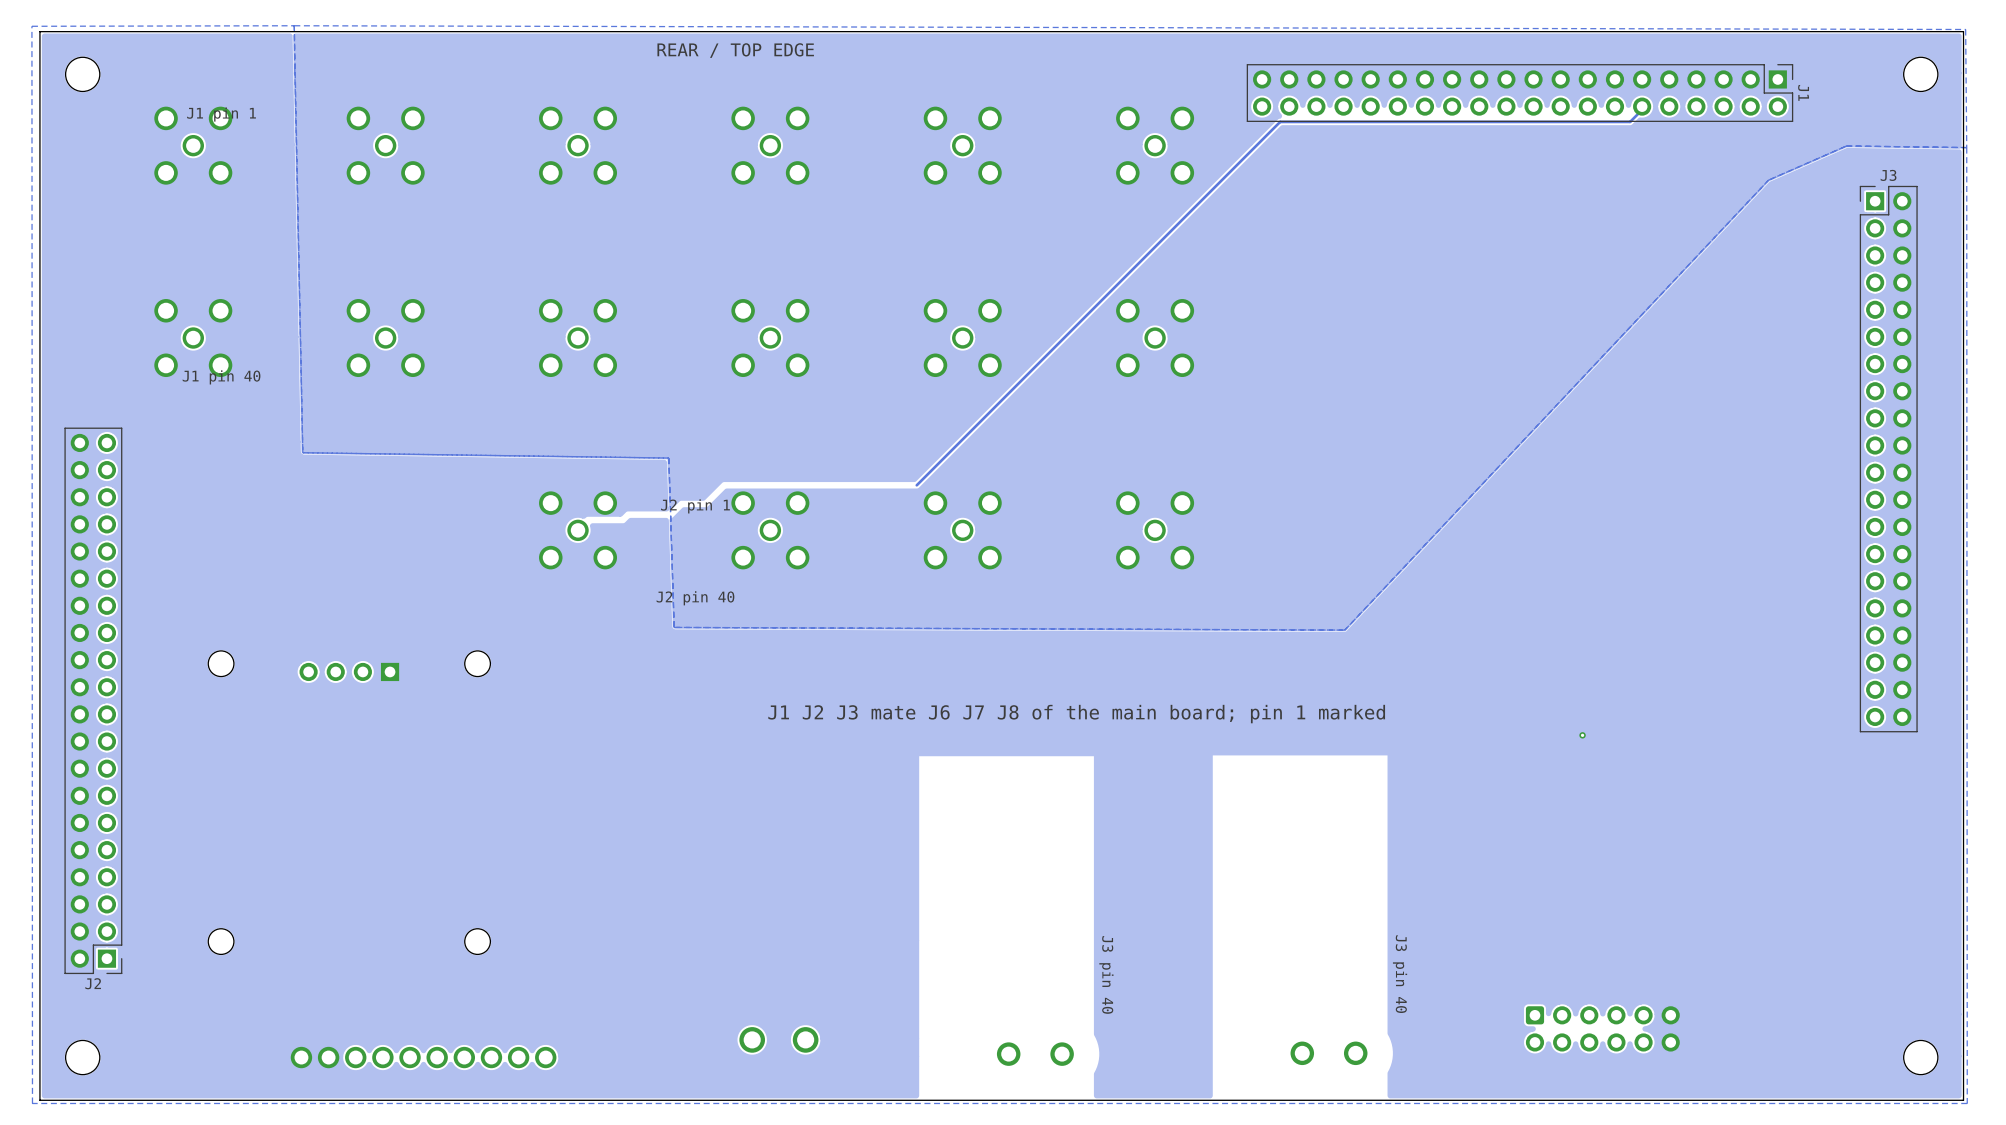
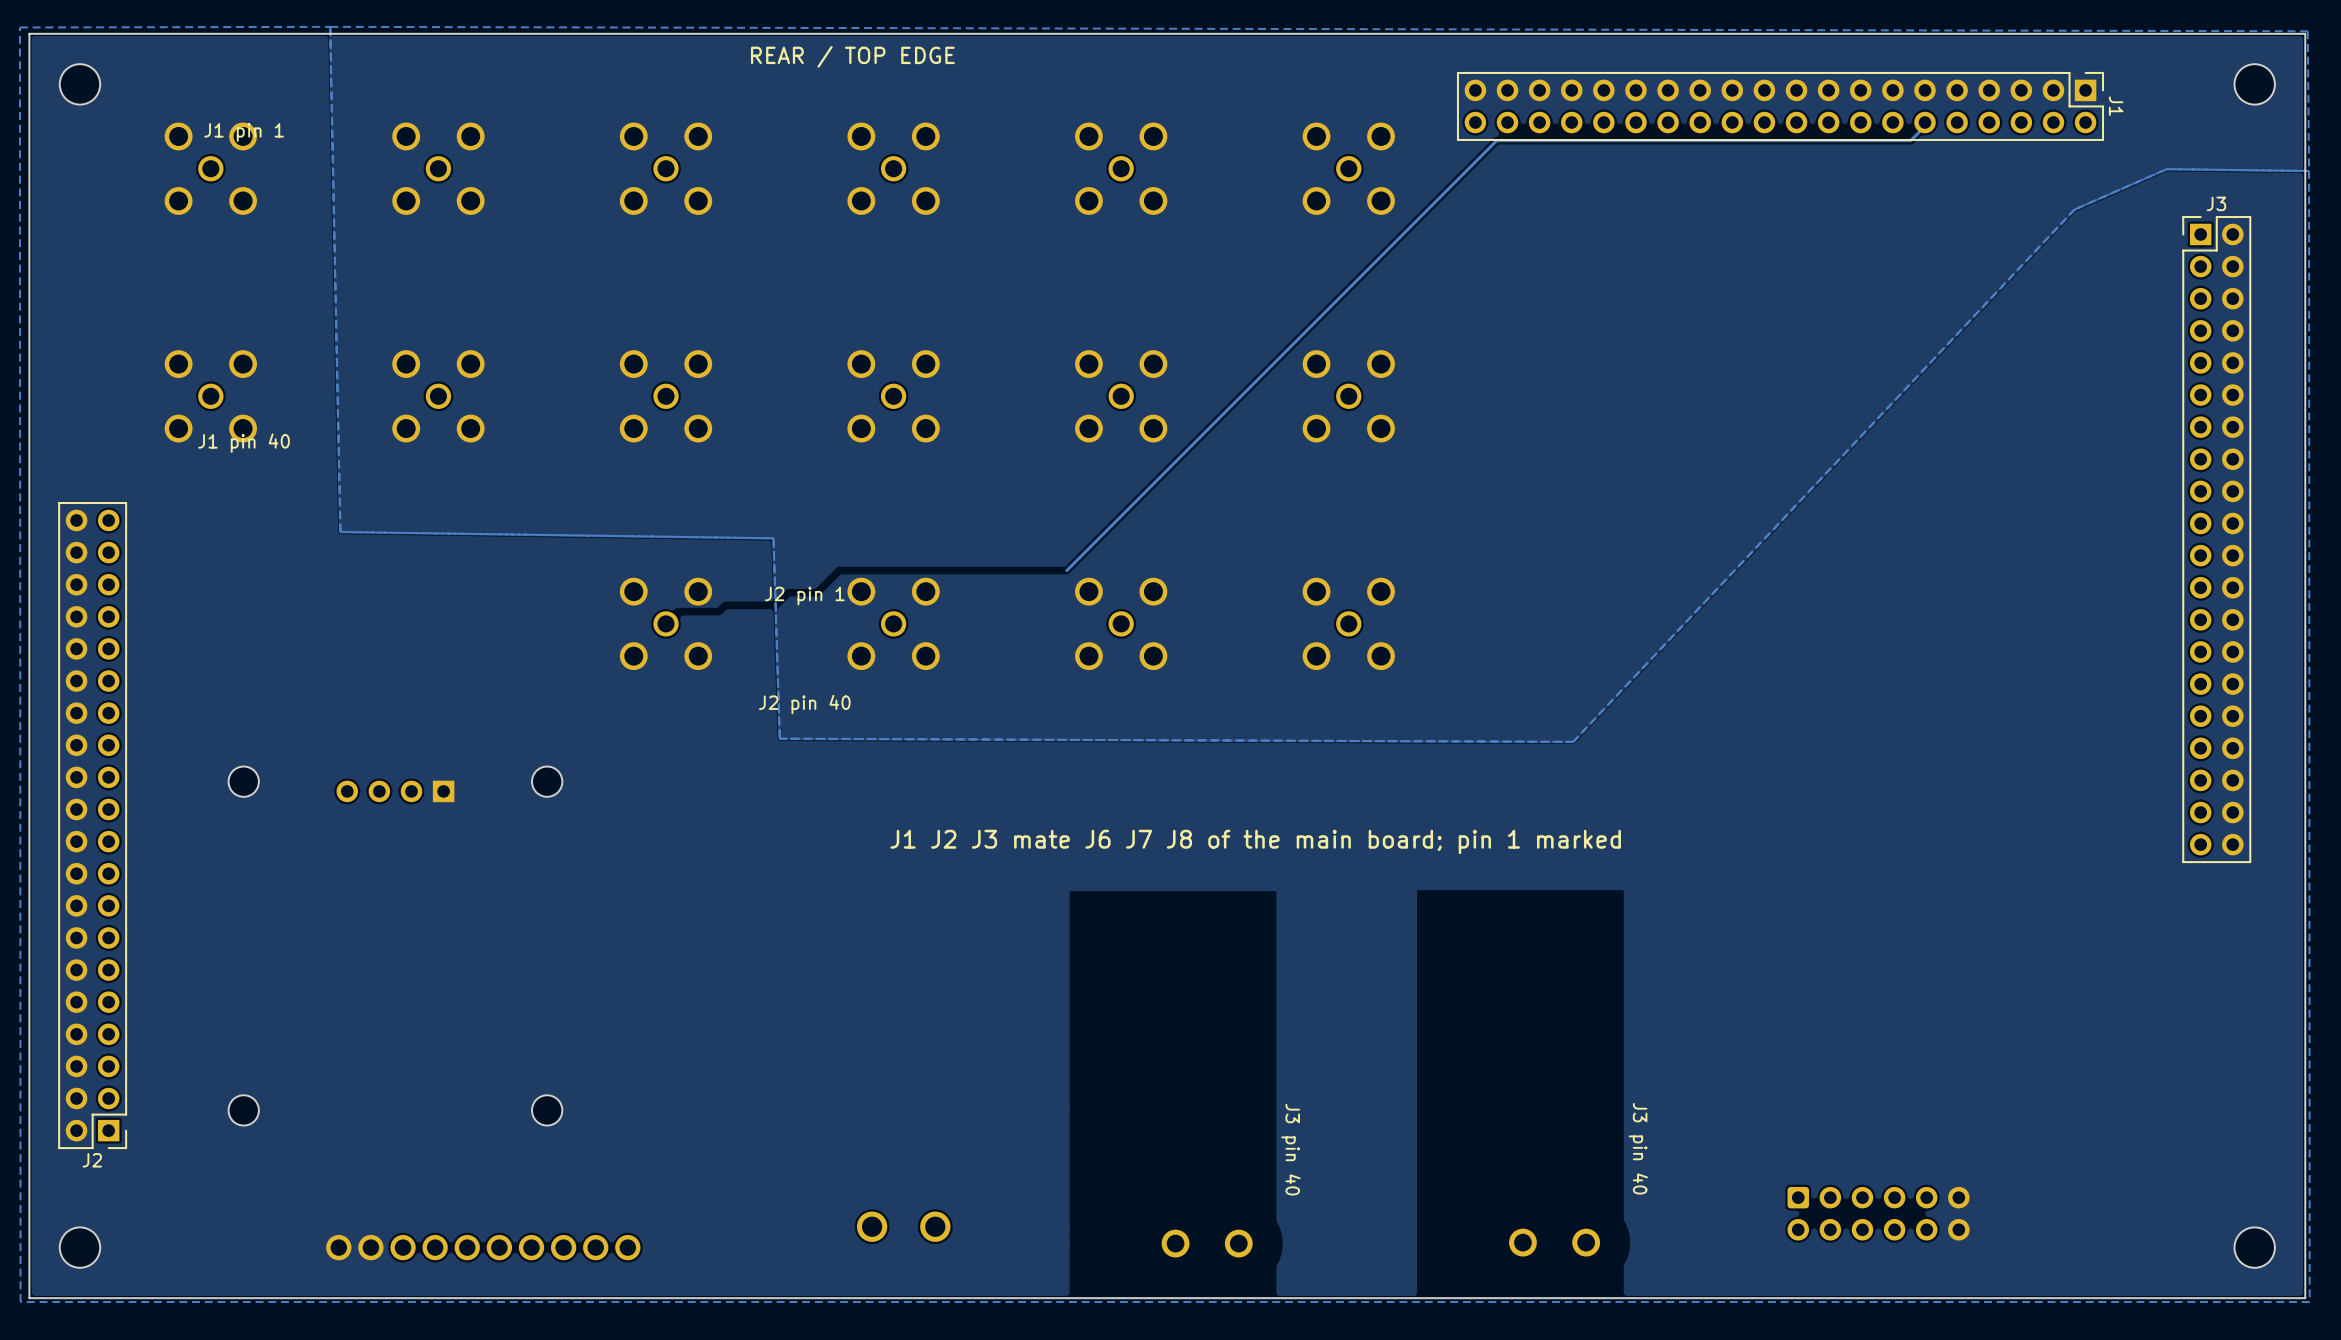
via: (1582, 735) -> none

